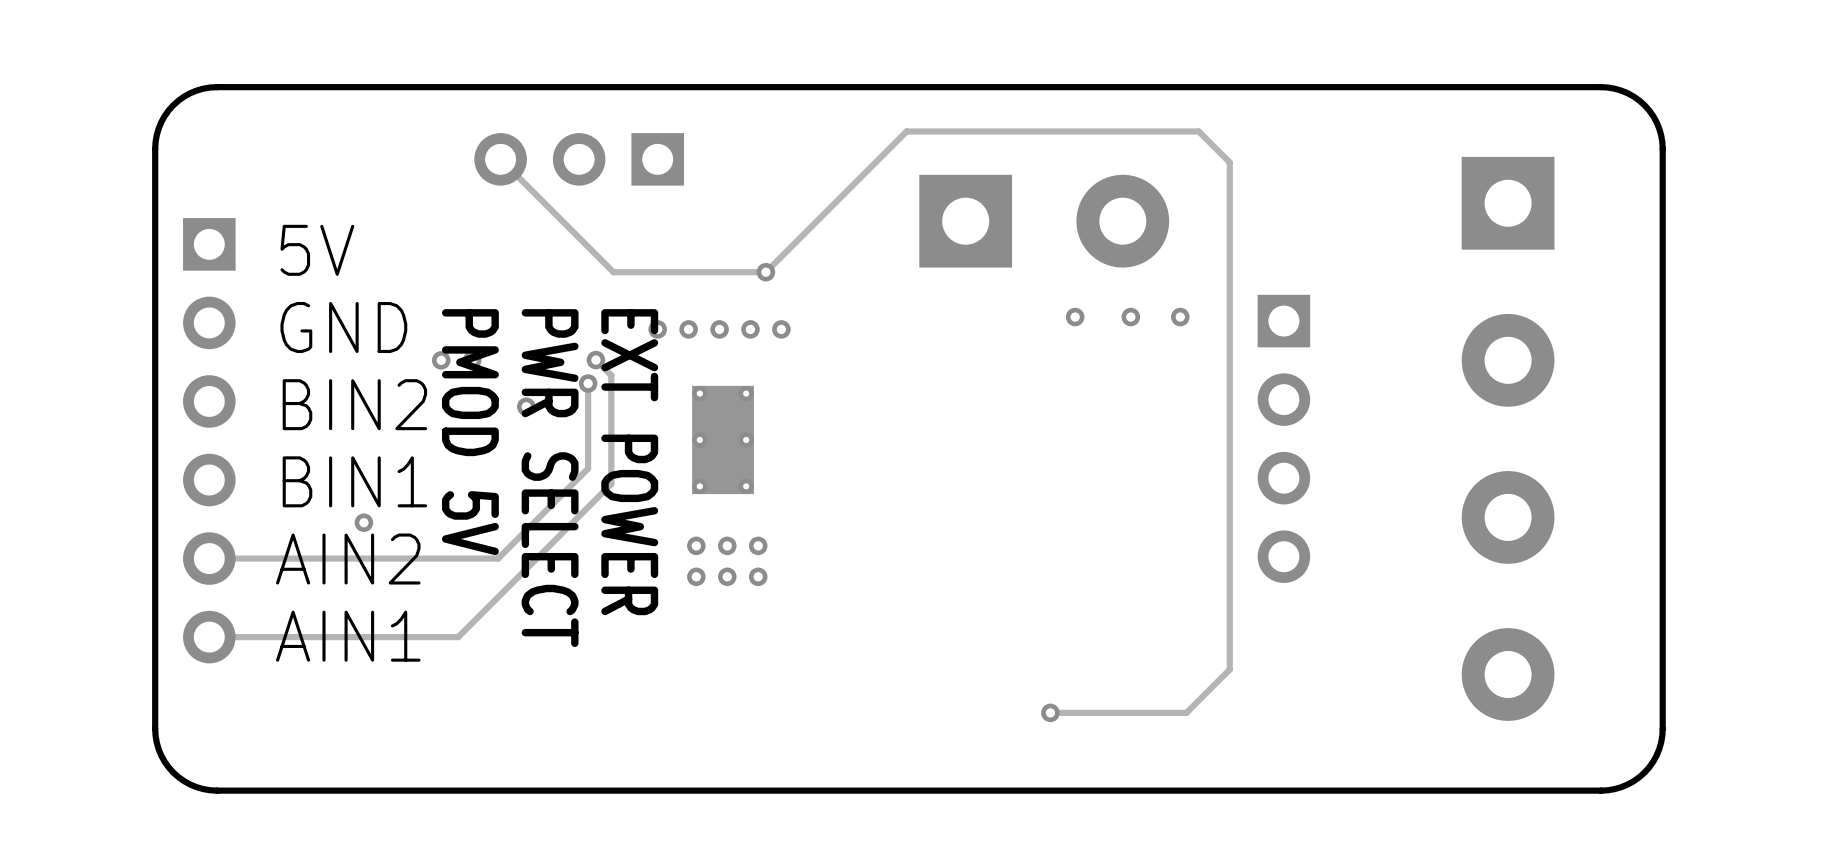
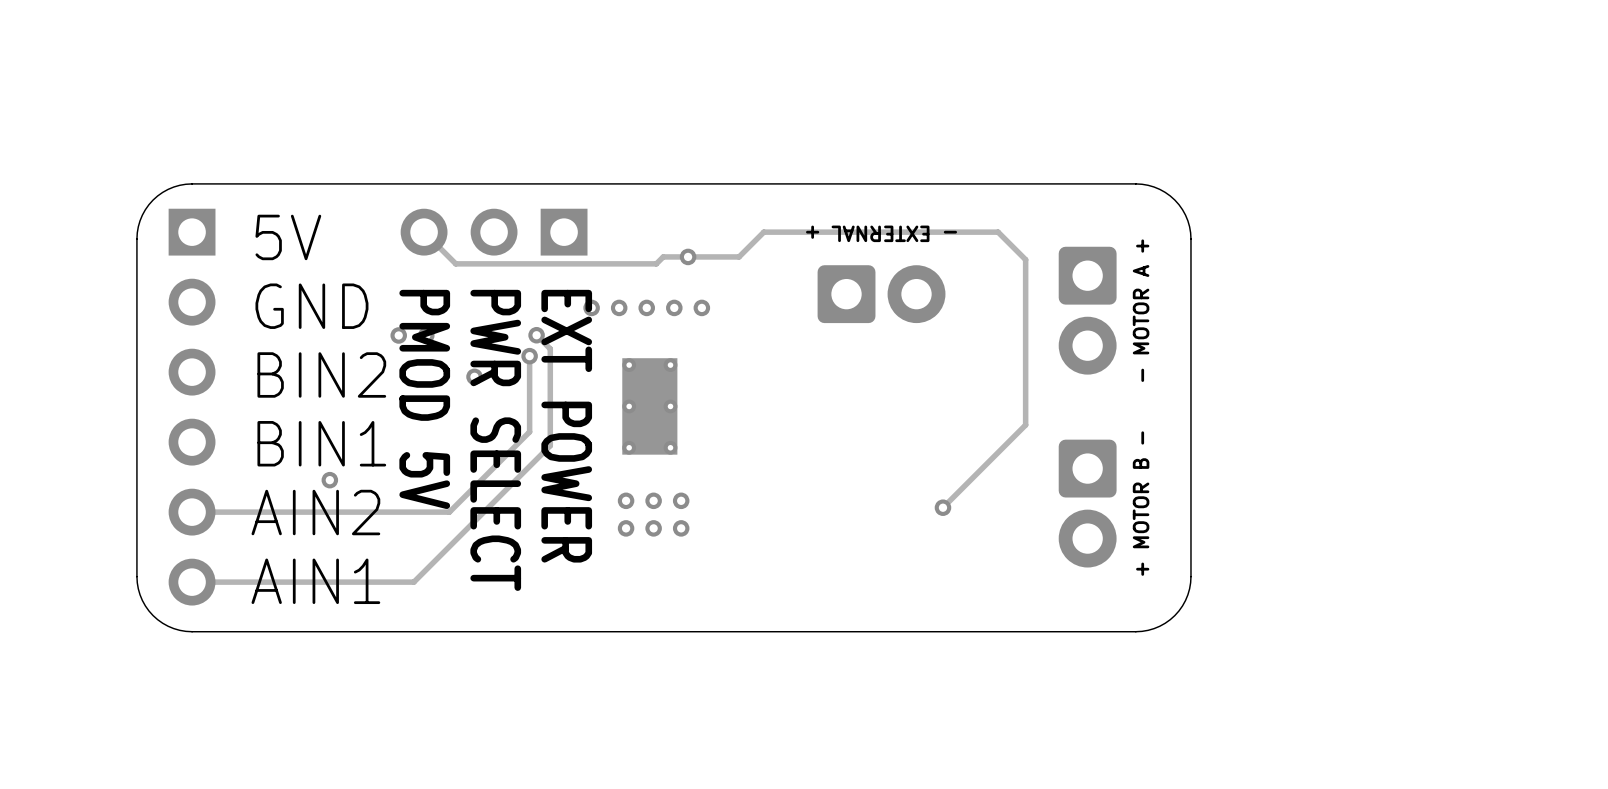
board edge: (1600, 87) (217, 87) (203, 88) (190, 93) (178, 100) (164, 116) (156, 135) (155, 148) (155, 728) (156, 742) (161, 755) (173, 772) (184, 781) (203, 789) (217, 790) (1600, 790) (1614, 789) (1627, 784) (1639, 777) (1653, 761) (1659, 749) (1662, 728) (1662, 148) (1661, 135) (1656, 122) (1644, 105) (1627, 93) (1614, 88) (1600, 87) -> (1135, 183) (1154, 187) (1174, 200) (1187, 220) (1190, 239) (1190, 582) (1182, 605) (1170, 619) (1159, 626) (1135, 631) (192, 631) (179, 630) (162, 623) (148, 610) (142, 600) (136, 576) (137, 232) (145, 209) (157, 195) (168, 189) (192, 183) (1135, 183)
track: (500, 159) (613, 272) (738, 272) -> (424, 232) (455, 263) (656, 263) (663, 256)
part position: (579, 159) -> (494, 232)
part: (1044, 221) -> none
text: none -> - EXTERNAL + (881, 233)
track: (765, 272) (906, 131) (1198, 131) (1229, 162) (1229, 669) (1186, 712) (1050, 712) (1047, 715) -> (688, 256) (739, 256) (763, 232) (998, 232) (1025, 259) (1025, 425) (942, 507)
part: none -> (881, 294)
via: (1075, 317) -> none
via: (1130, 317) -> none
via: (1180, 317) -> none
part: none -> (1087, 310)
text: none -> - MOTOR A + (1141, 310)
part: (1283, 438) -> none
part: (1508, 438) -> none
part: none -> (1087, 503)
text: none -> + MOTOR B - (1141, 503)
via: none -> (942, 507)
via: (1050, 712) -> none

